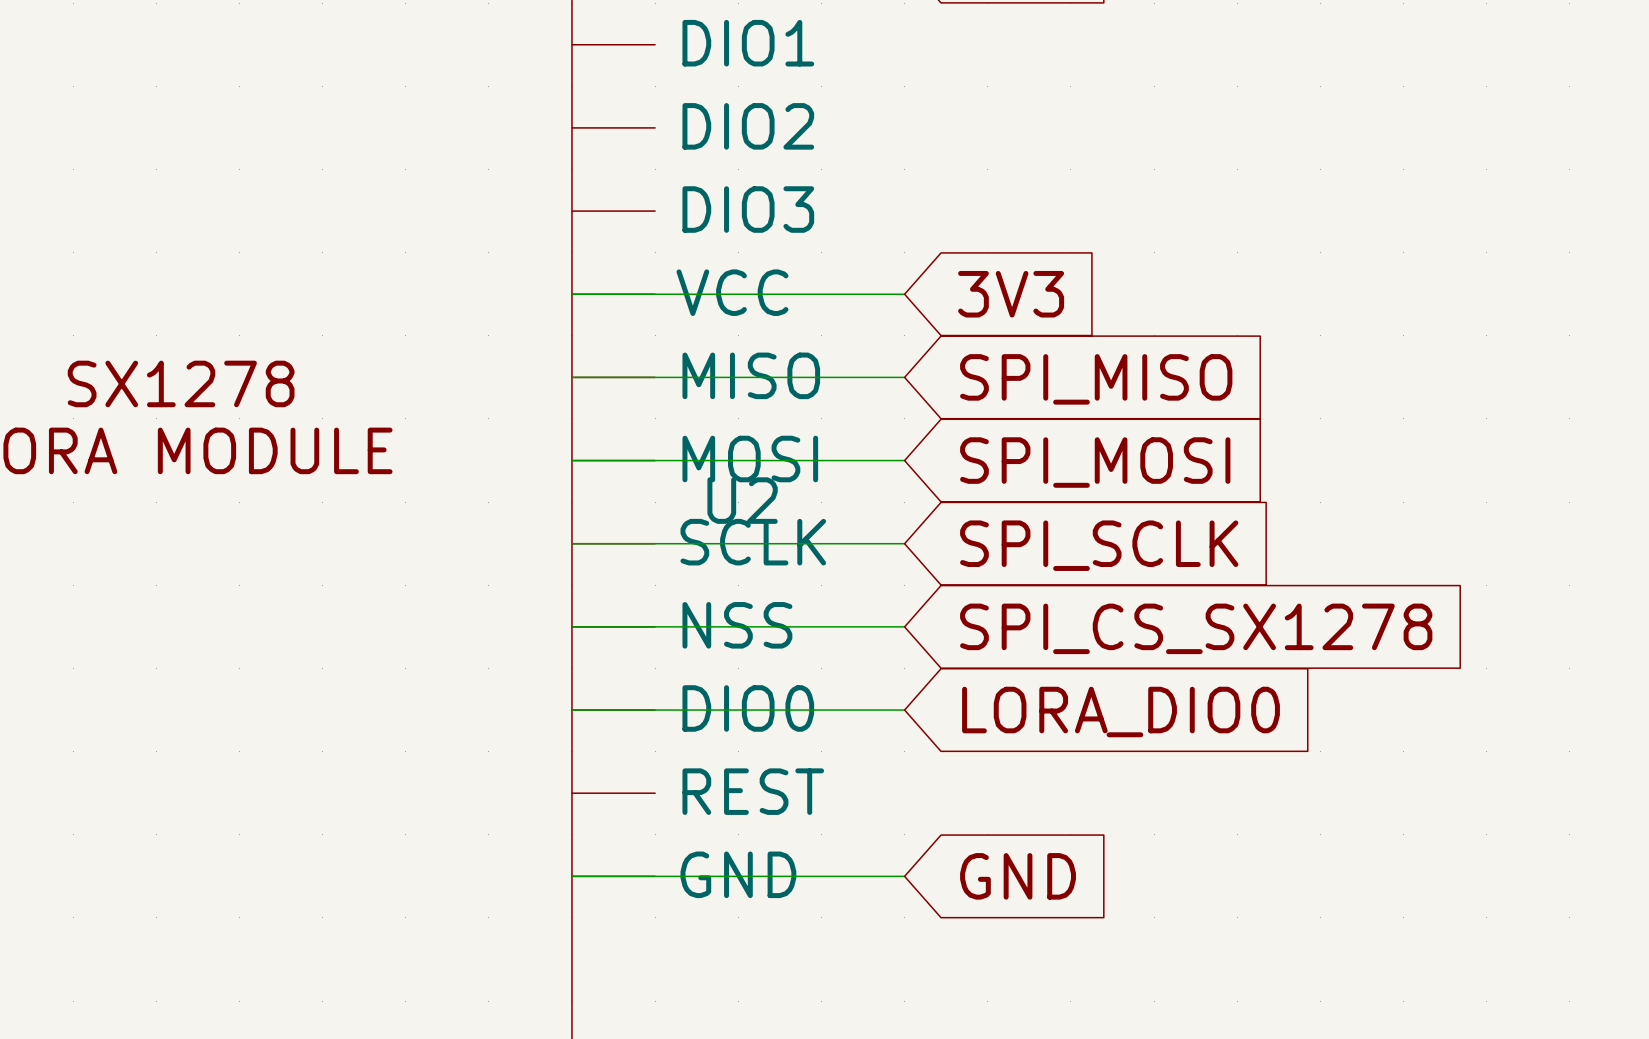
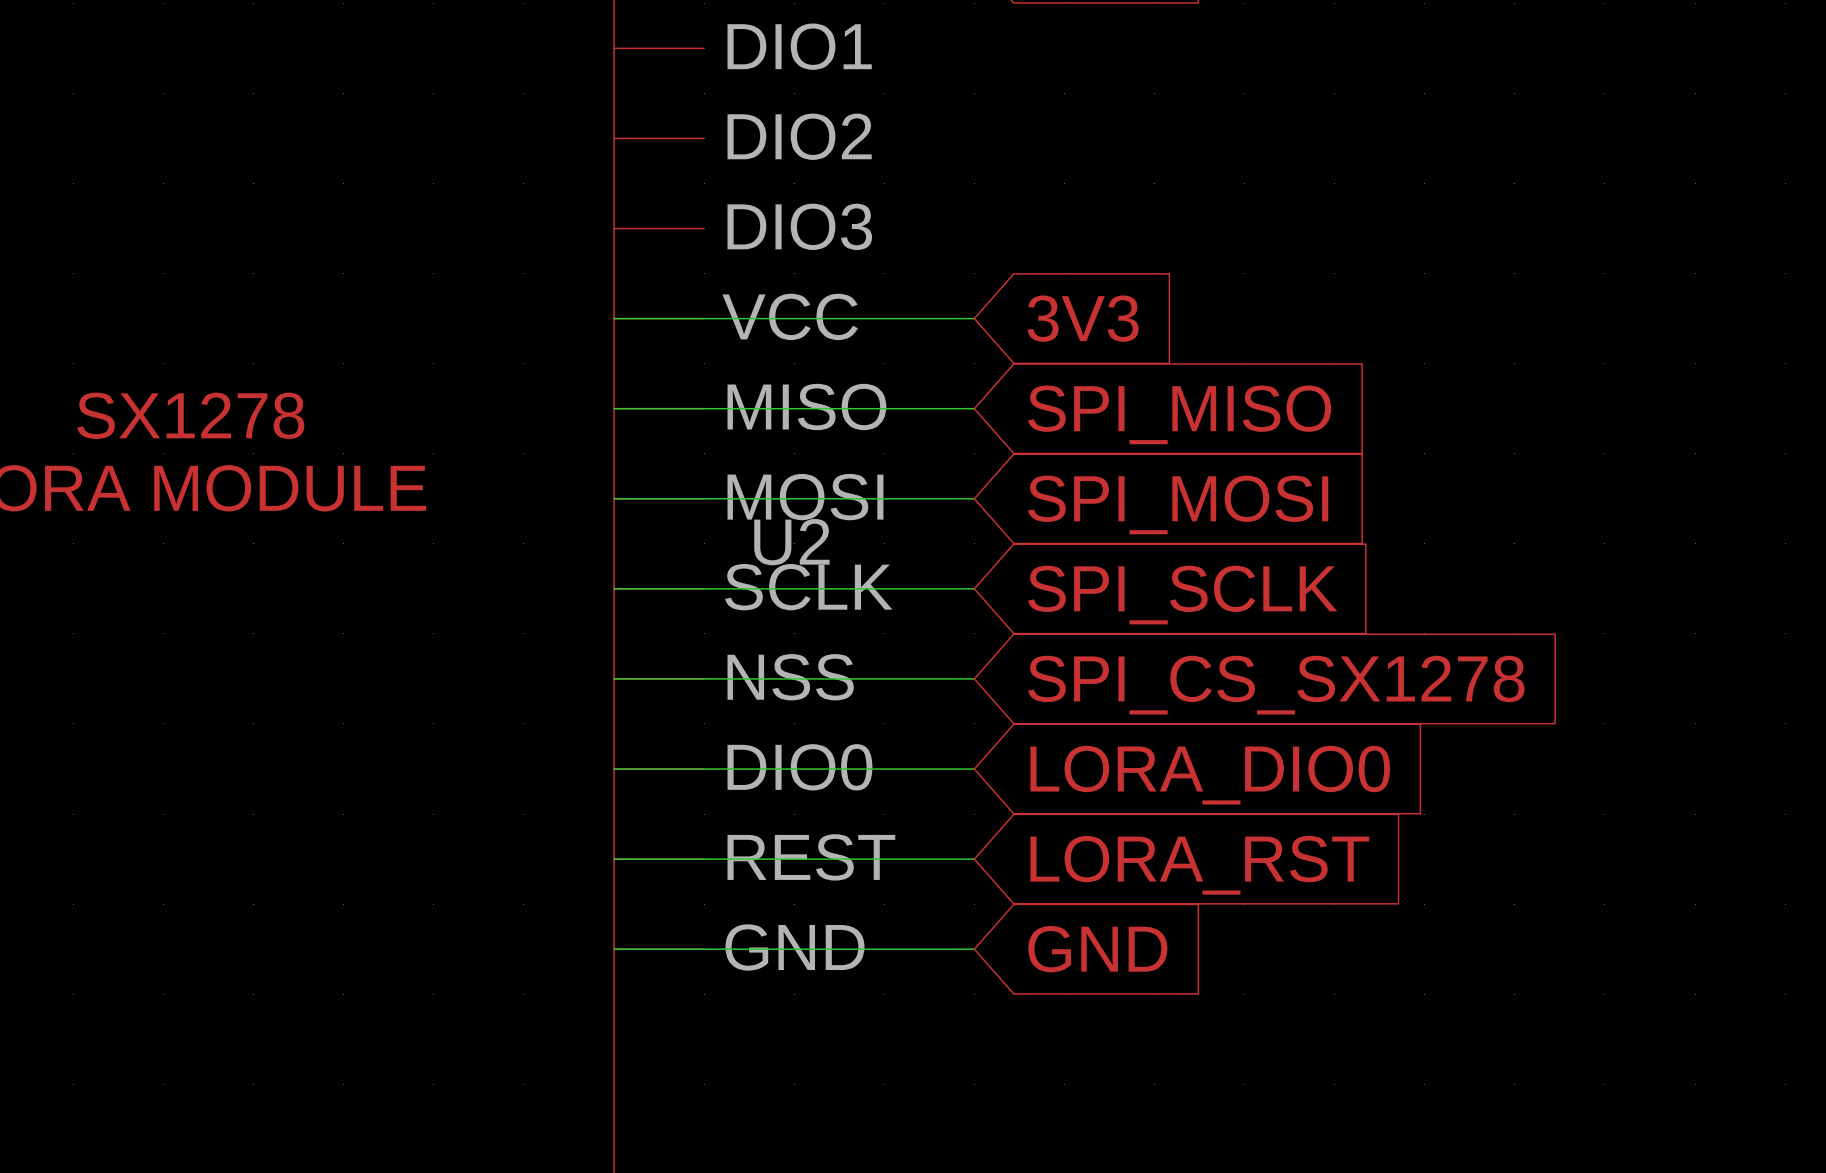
wire: none -> (614, 859) (974, 859)
global label: none -> LORA_RST (1199, 865)

